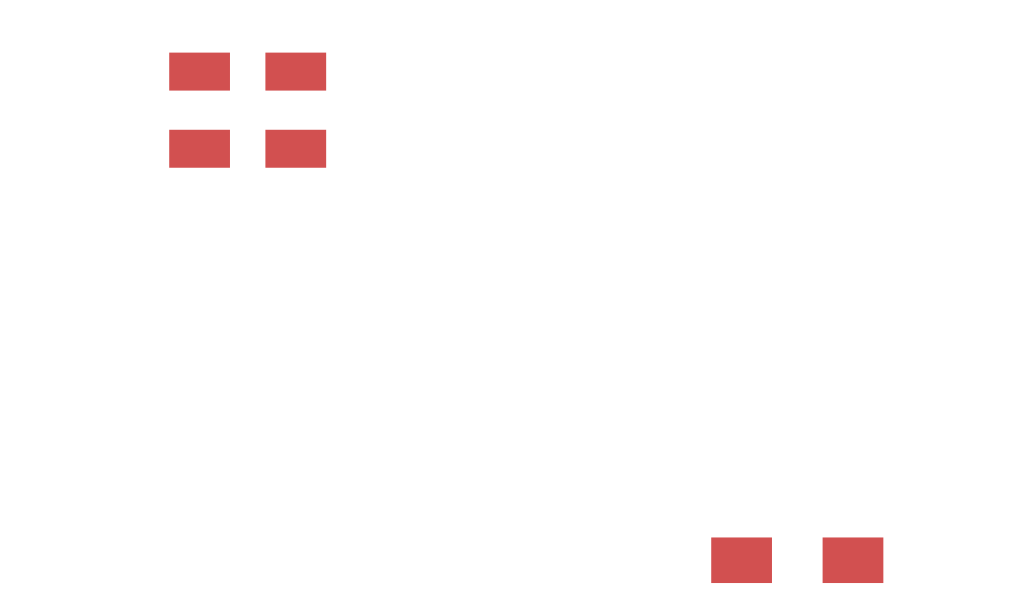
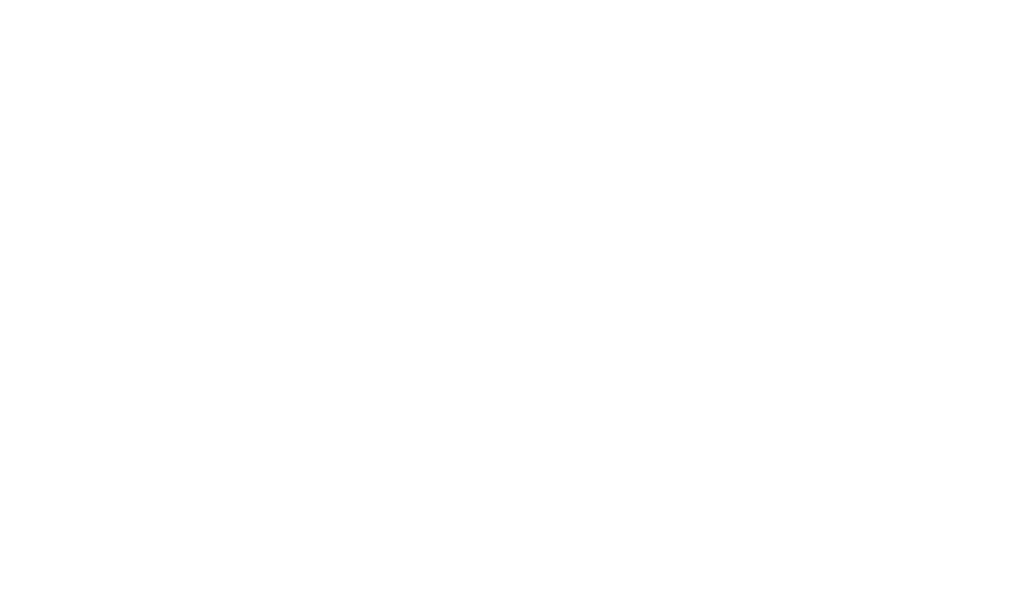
part: (247, 71) -> none
part: (247, 148) -> none
part: (797, 560) -> none

